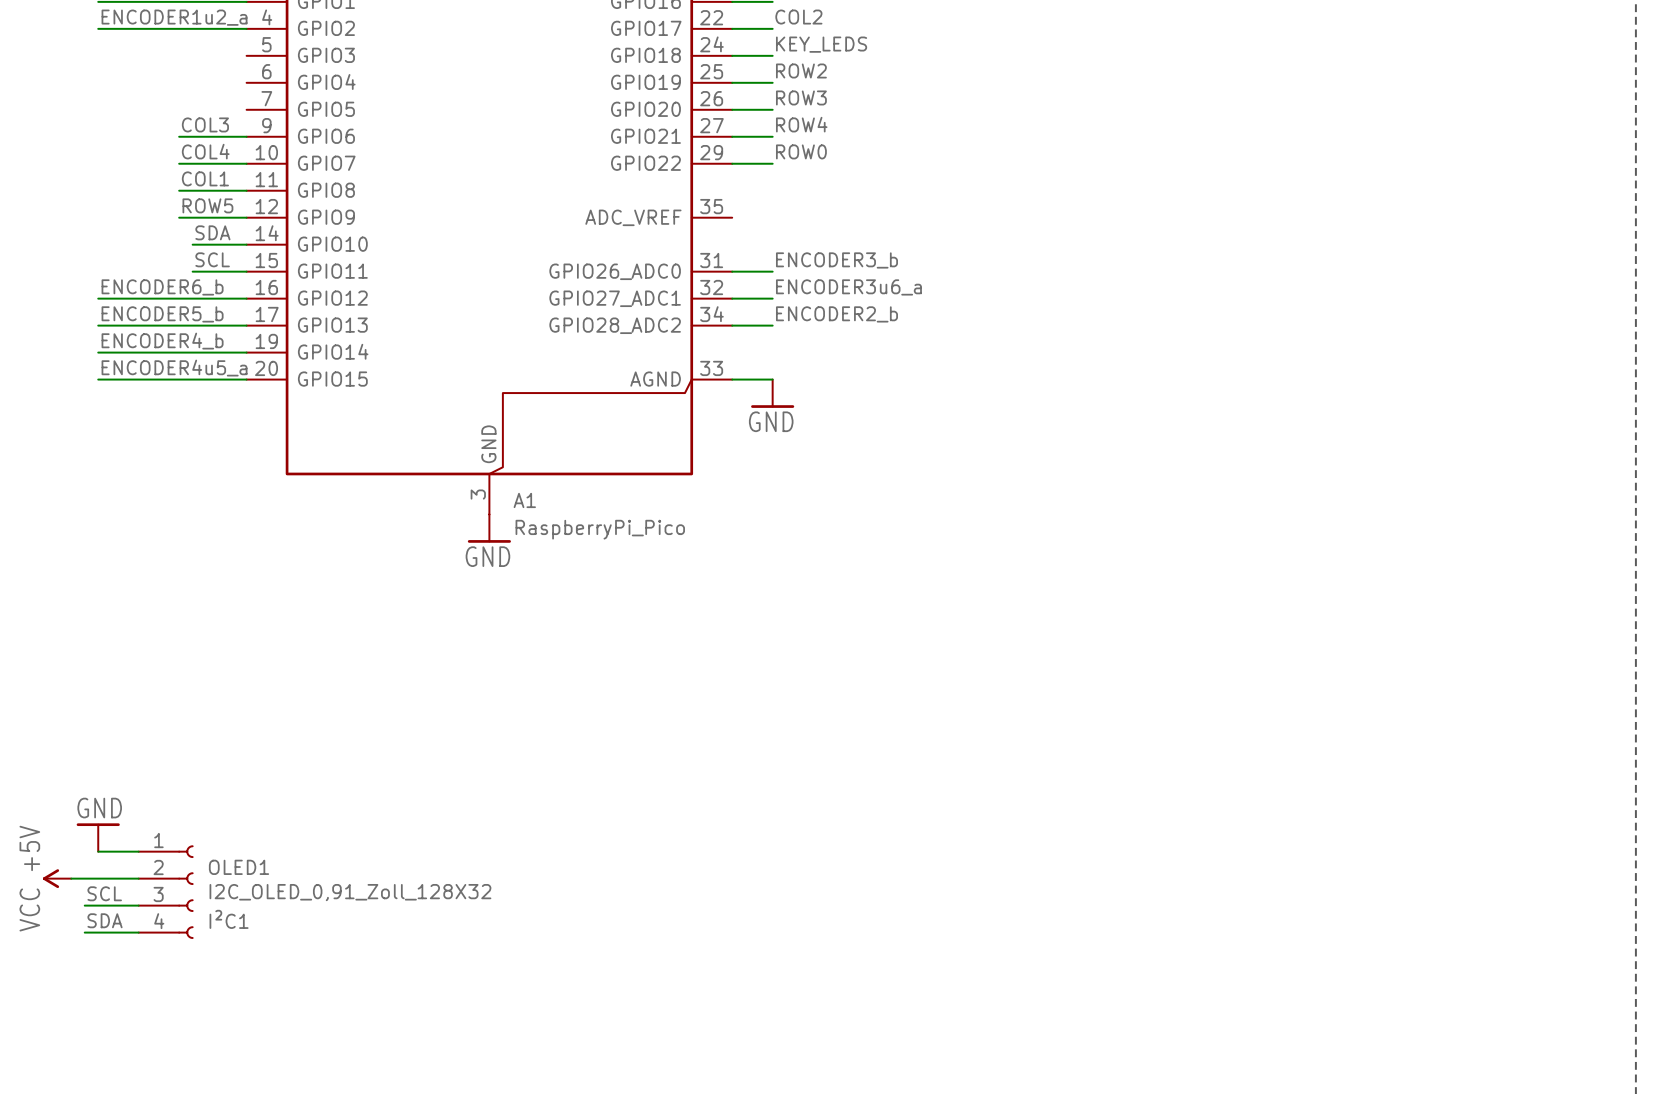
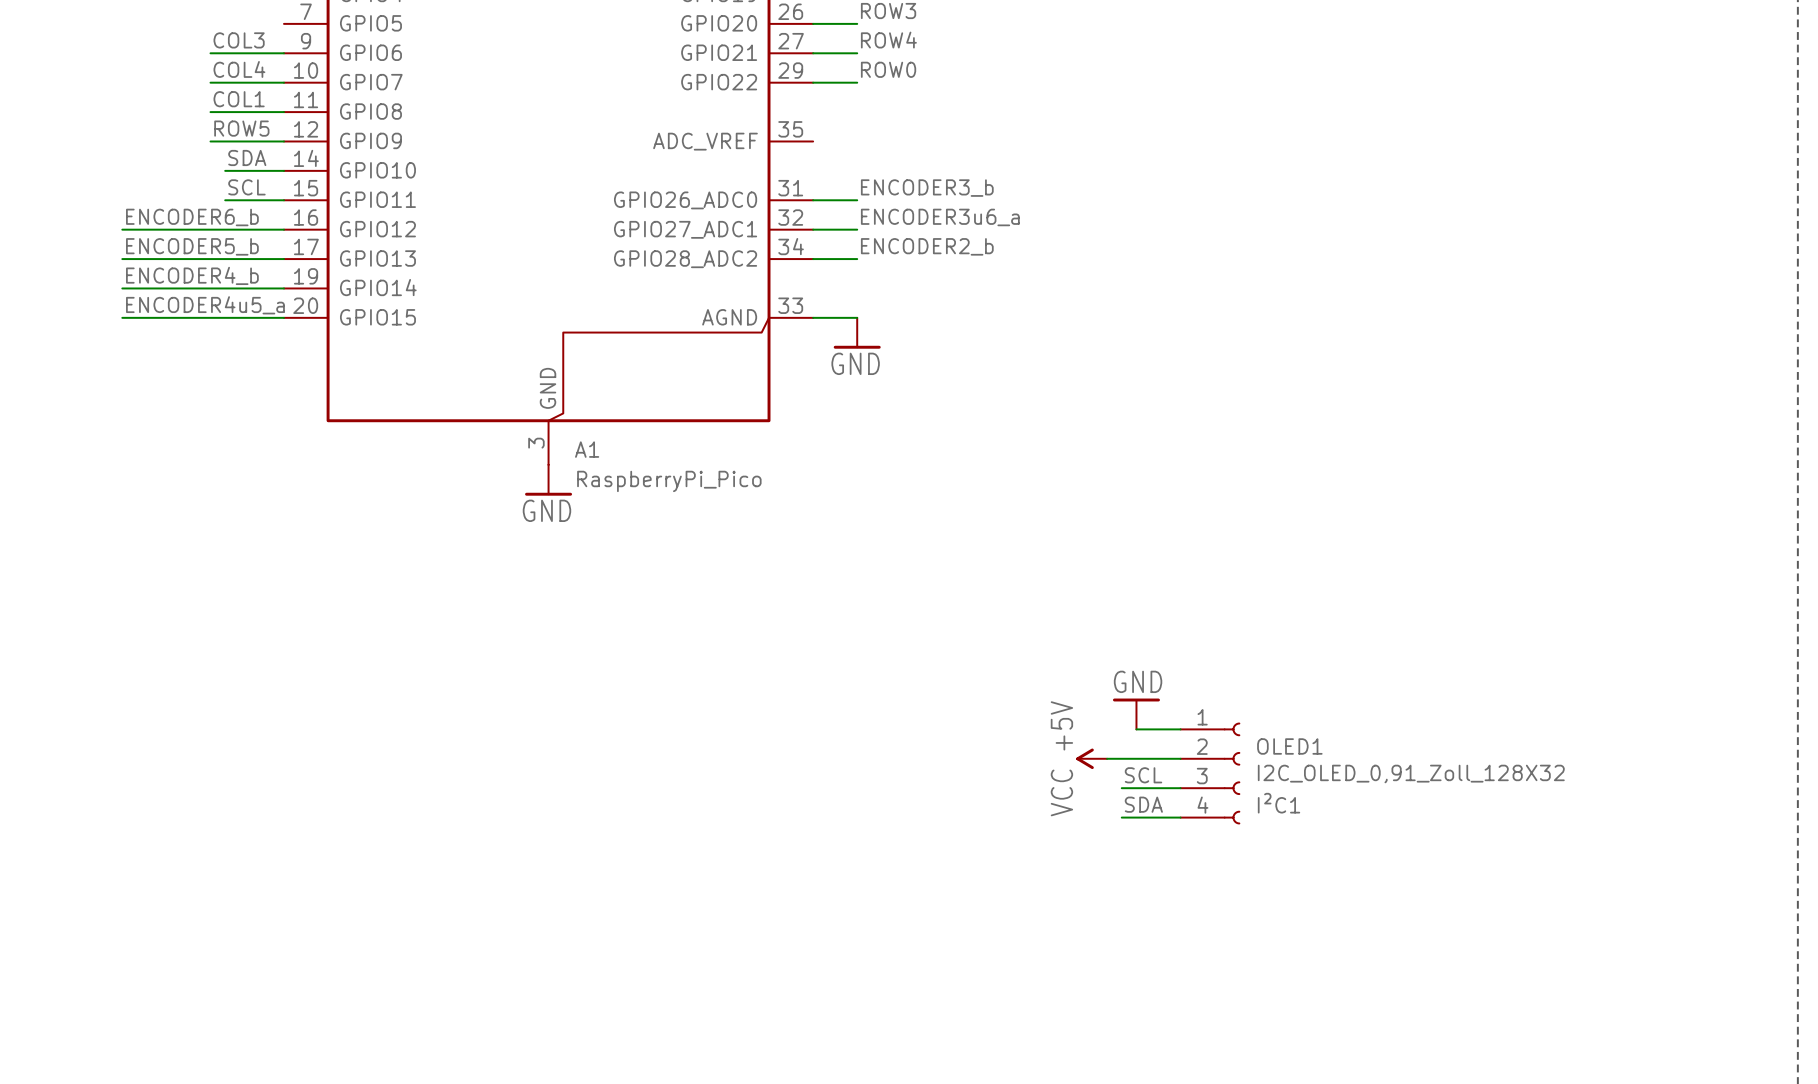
power symbol: none -> GND (1136, 713)
wire: none -> (1136, 729) (1180, 729)
power symbol: none -> VCC +5V (1091, 758)
wire: none -> (1107, 758) (1180, 758)
label: none -> SCL (1143, 775)
wire: none -> (1121, 788) (1180, 788)
label: none -> SDA (1143, 804)
power symbol: GND (98, 837) -> none
wire: none -> (1121, 817) (1180, 817)
wire: (98, 851) (138, 851) -> none
power symbol: VCC +5V (57, 878) -> none
wire: (71, 878) (138, 878) -> none
OLED1 position: (166, 892) -> (1210, 773)
label: SCL (104, 893) -> none
wire: (84, 905) (138, 905) -> none
label: SDA (105, 920) -> none
wire: (84, 932) (138, 932) -> none

